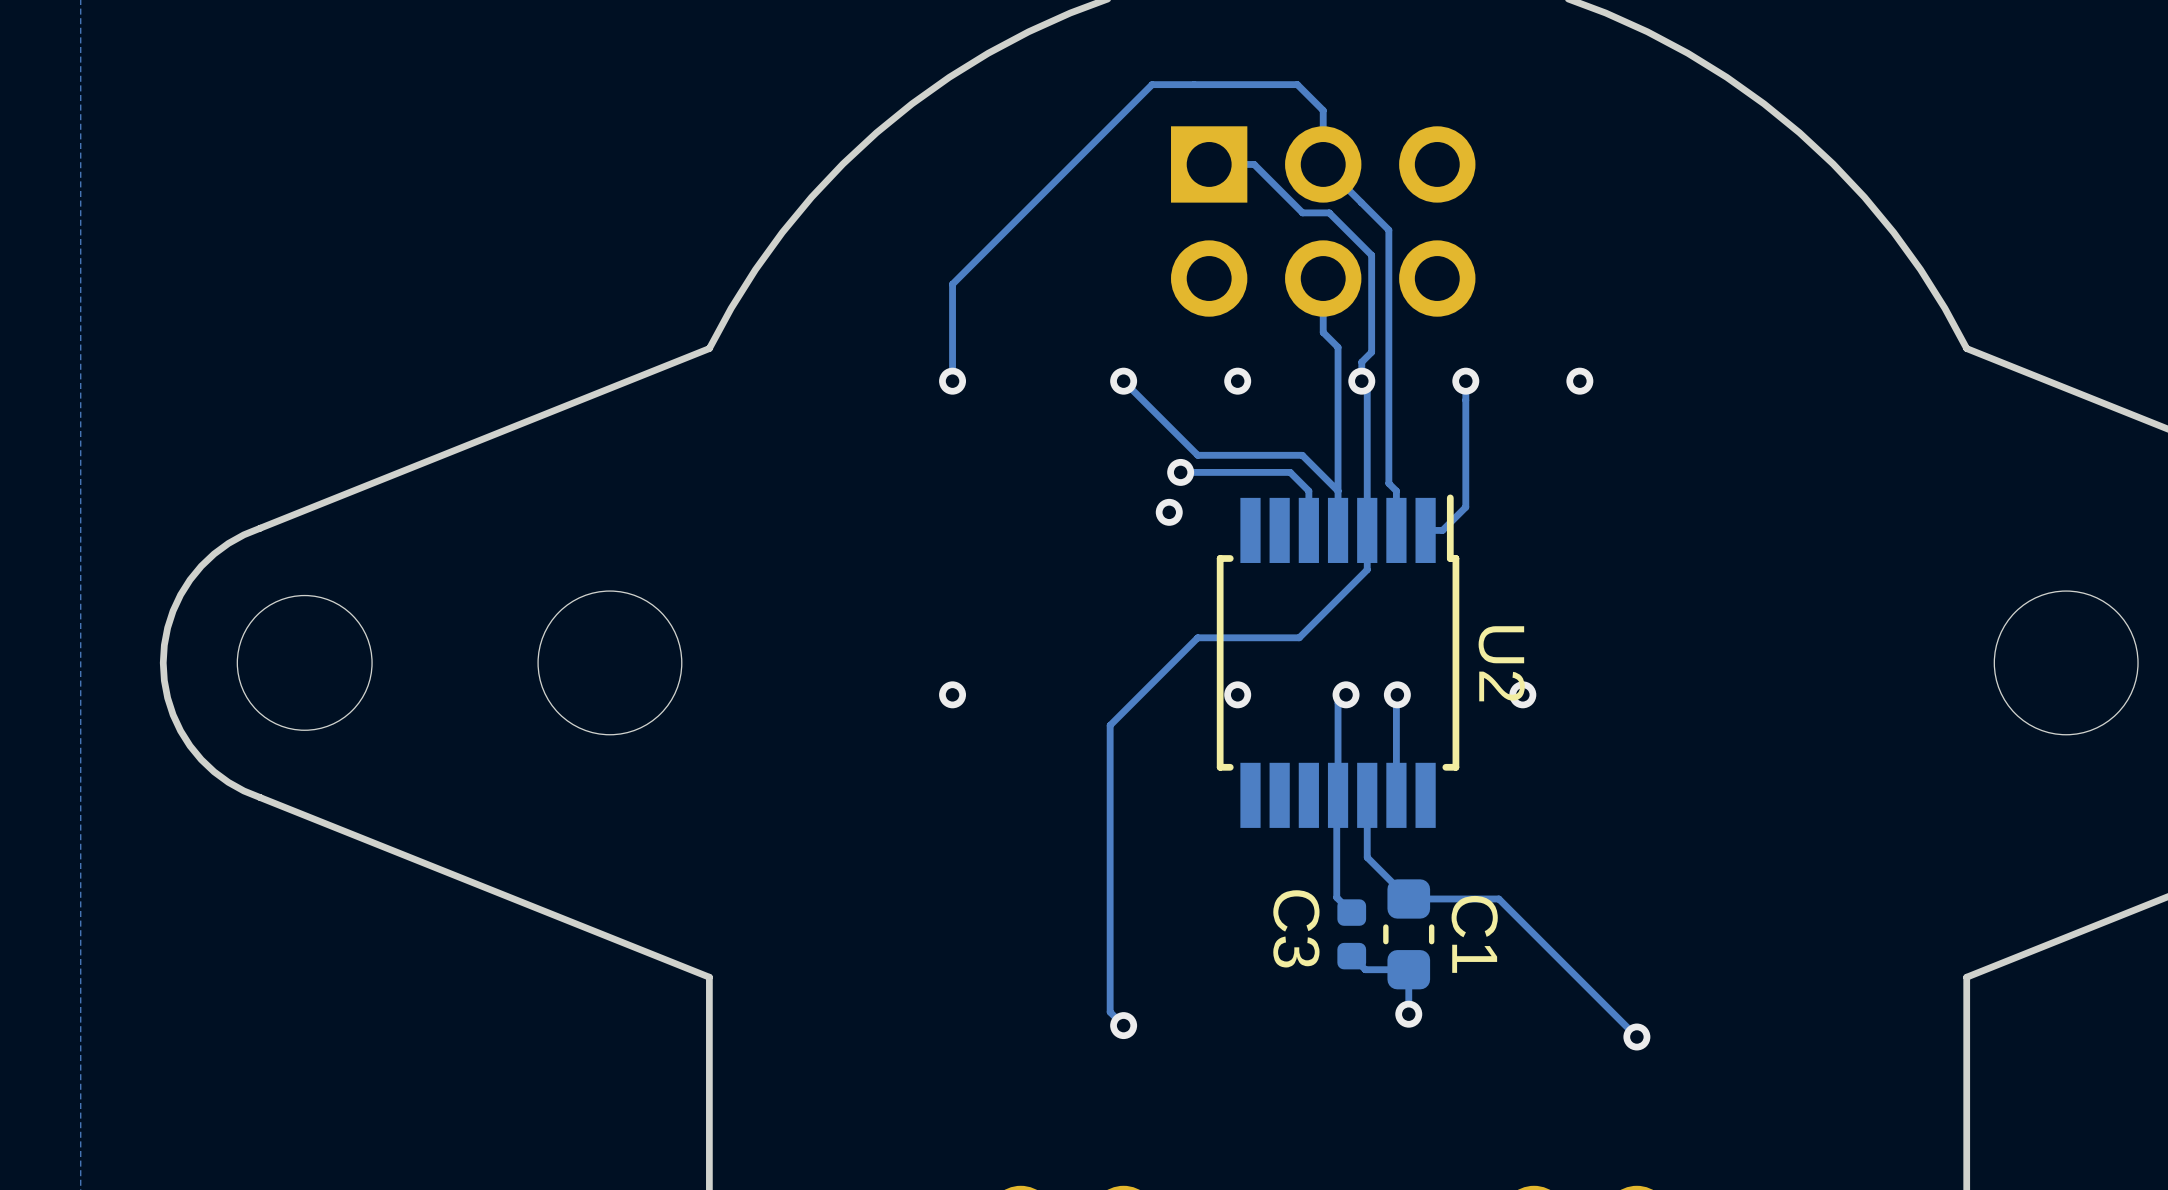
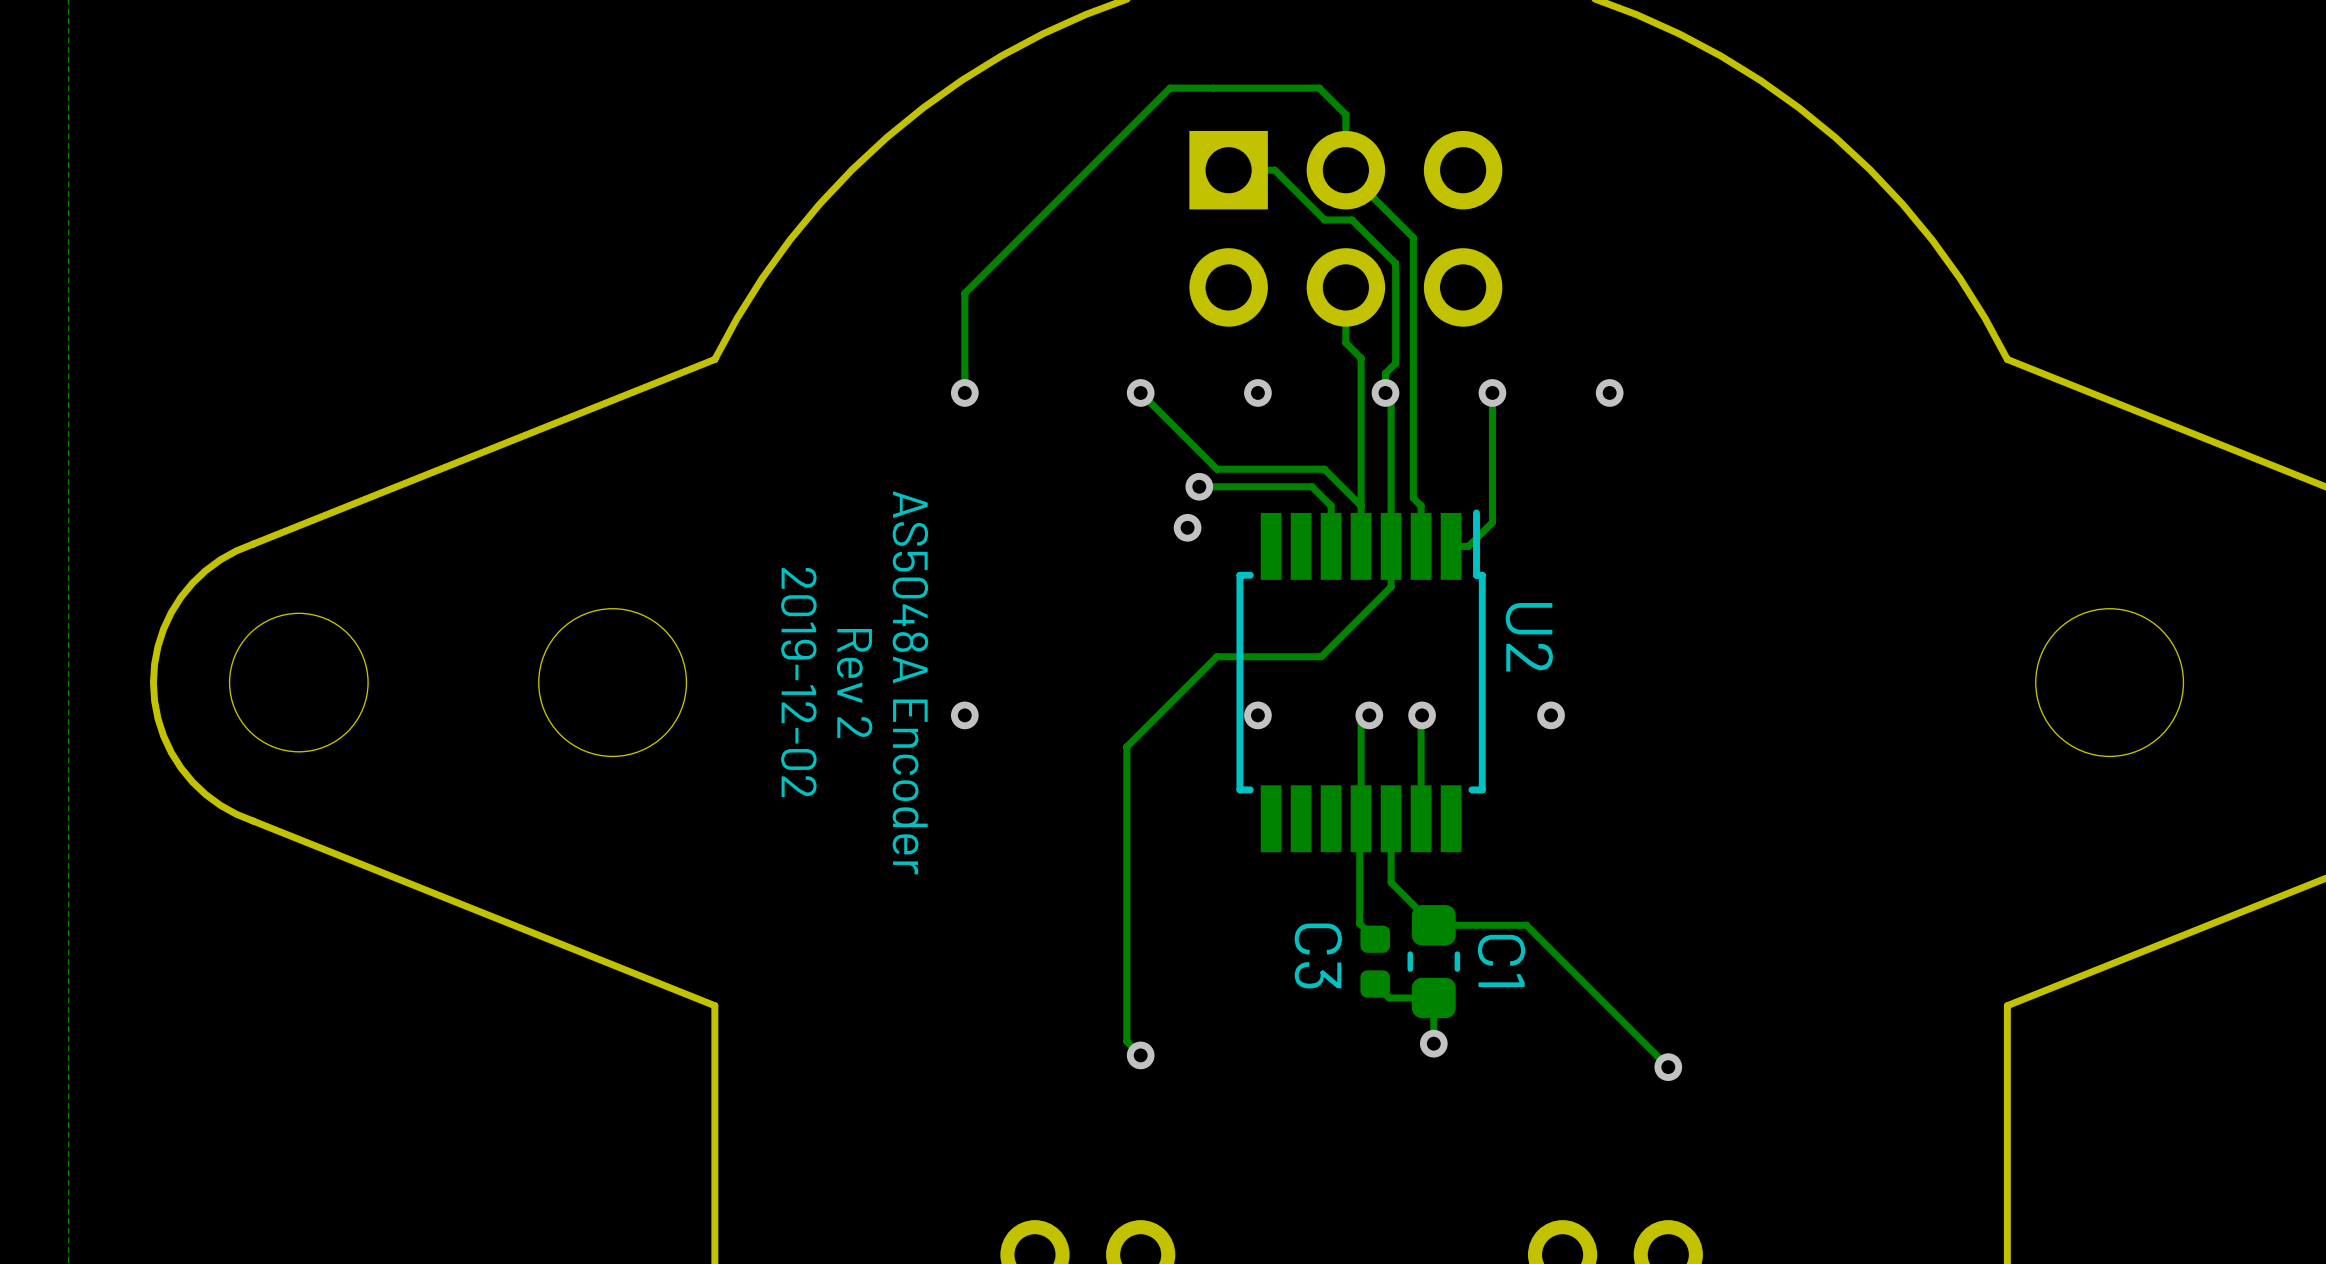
text: none -> 2019-12-02 (798, 682)
text: none -> AS5048A Encoder (910, 683)
text: none -> Rev 2 (854, 683)
U2 name position: U2 (1501, 663) -> U2 (1529, 637)

